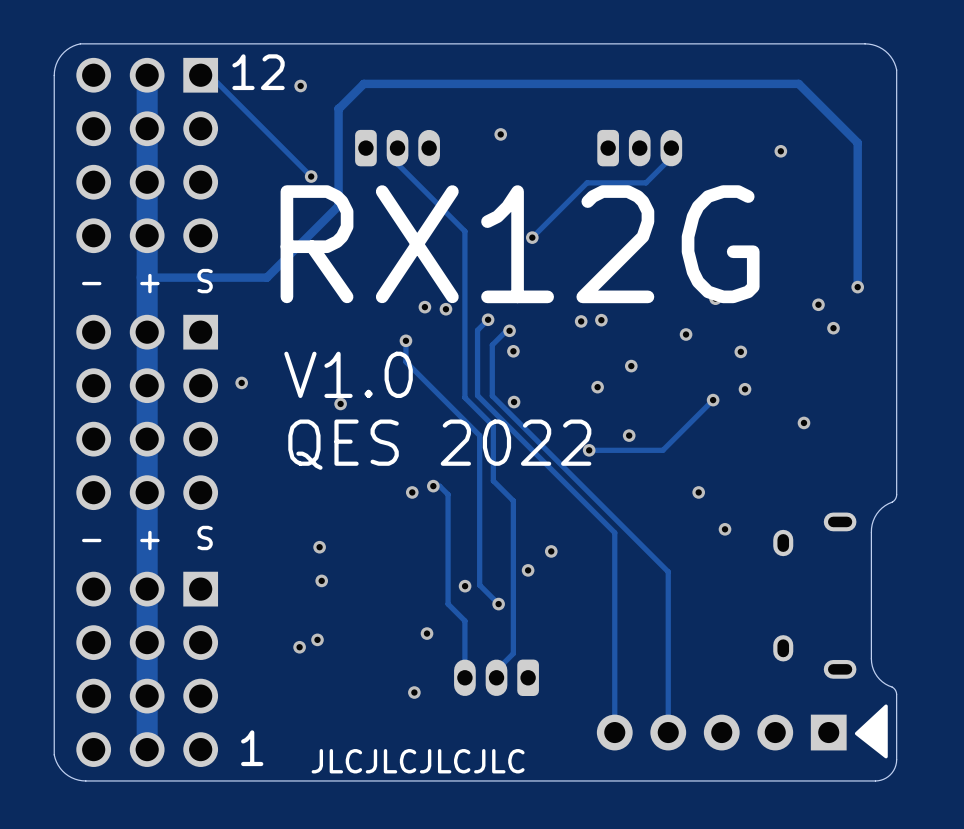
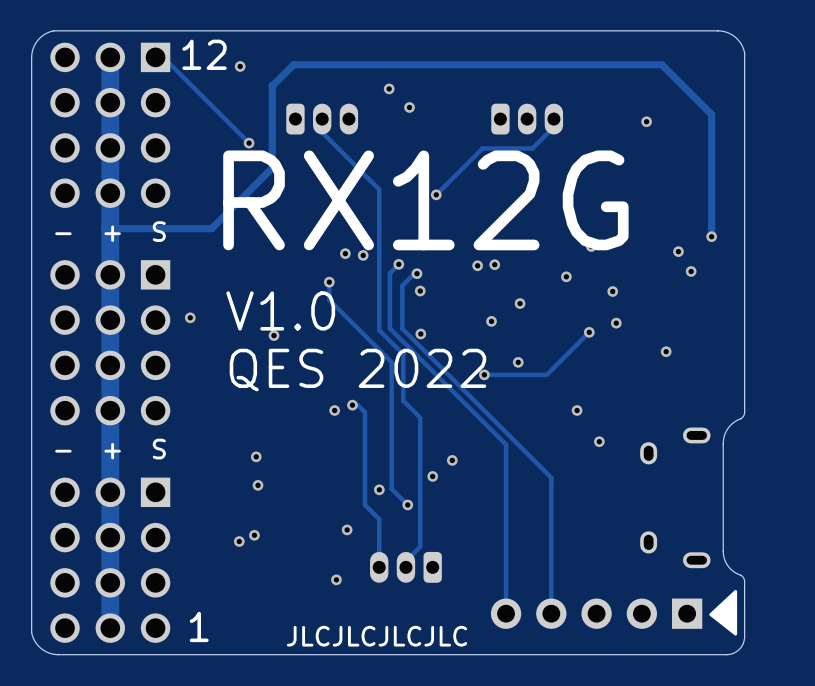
via: none -> (389, 88)
text position: JLCJLCJLCJLC (418, 761) -> JLCJLCJLCJLC (377, 636)

